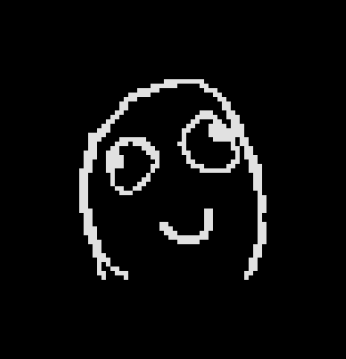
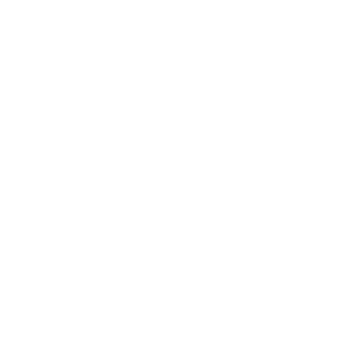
drawing: [79, 79, 267, 280] -> none

